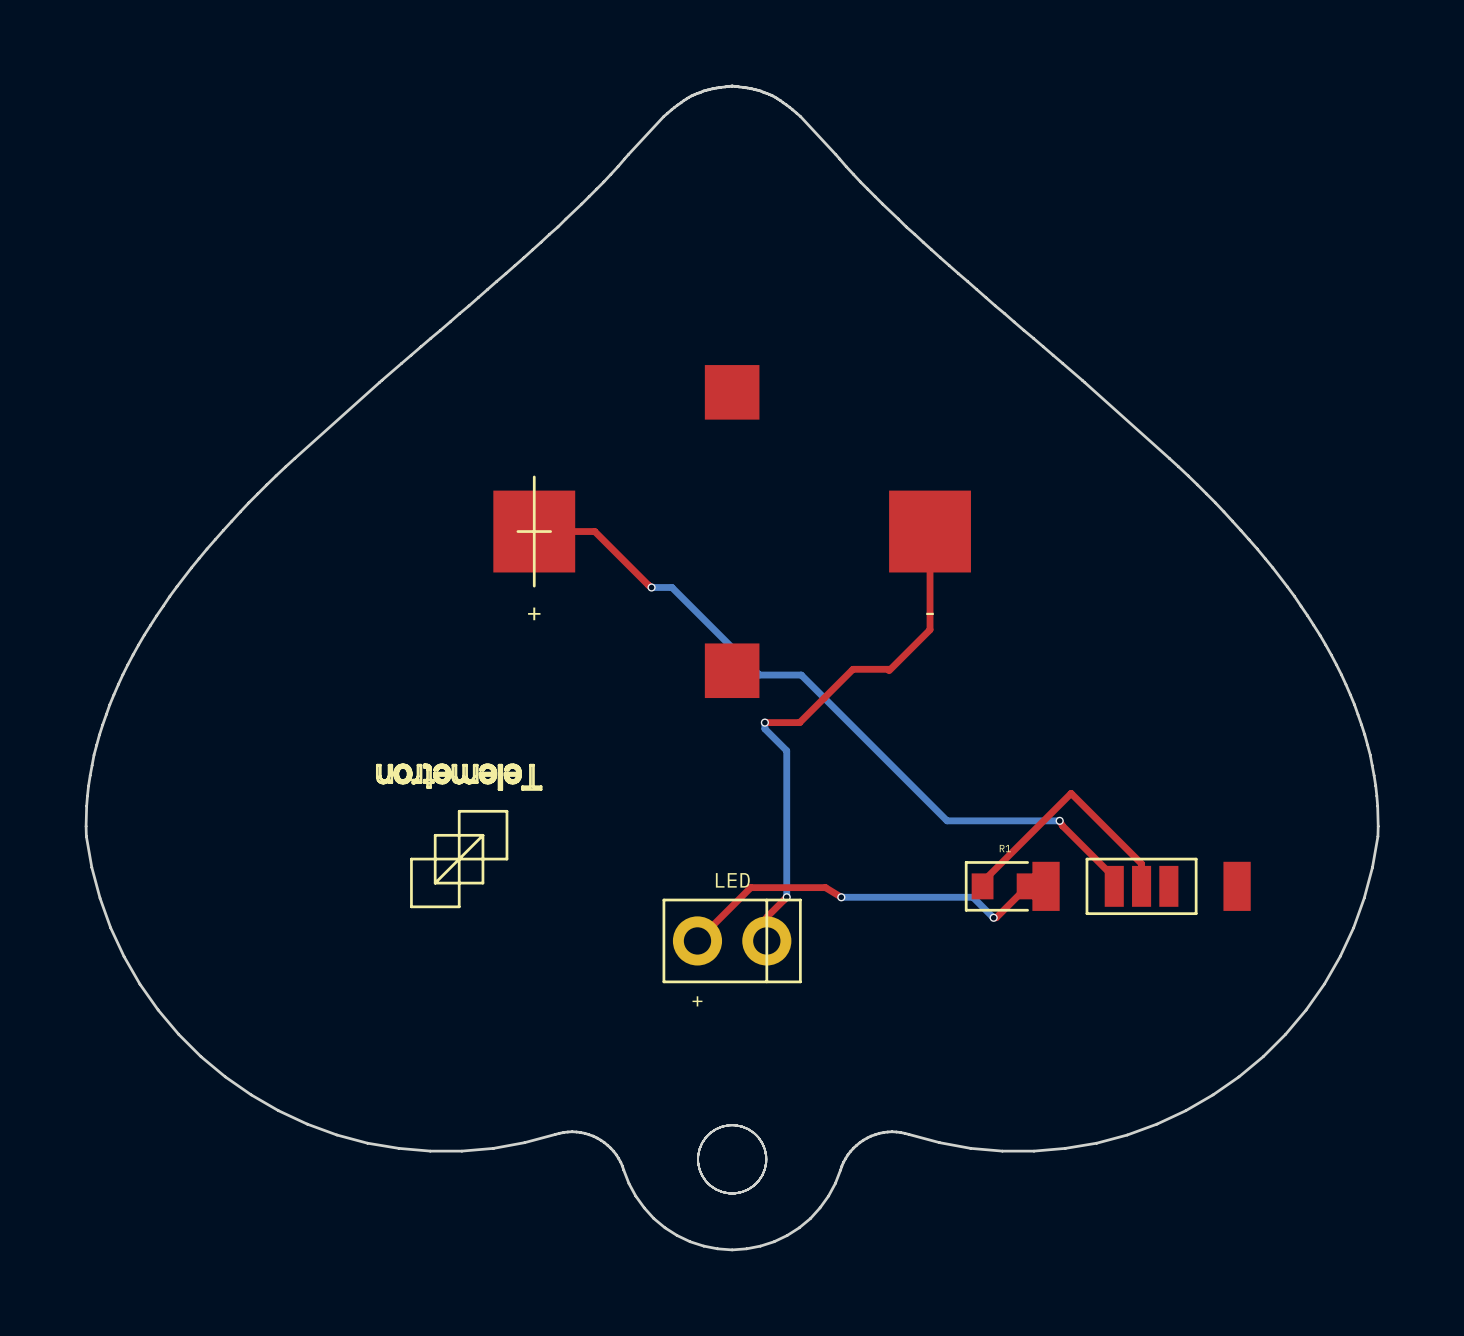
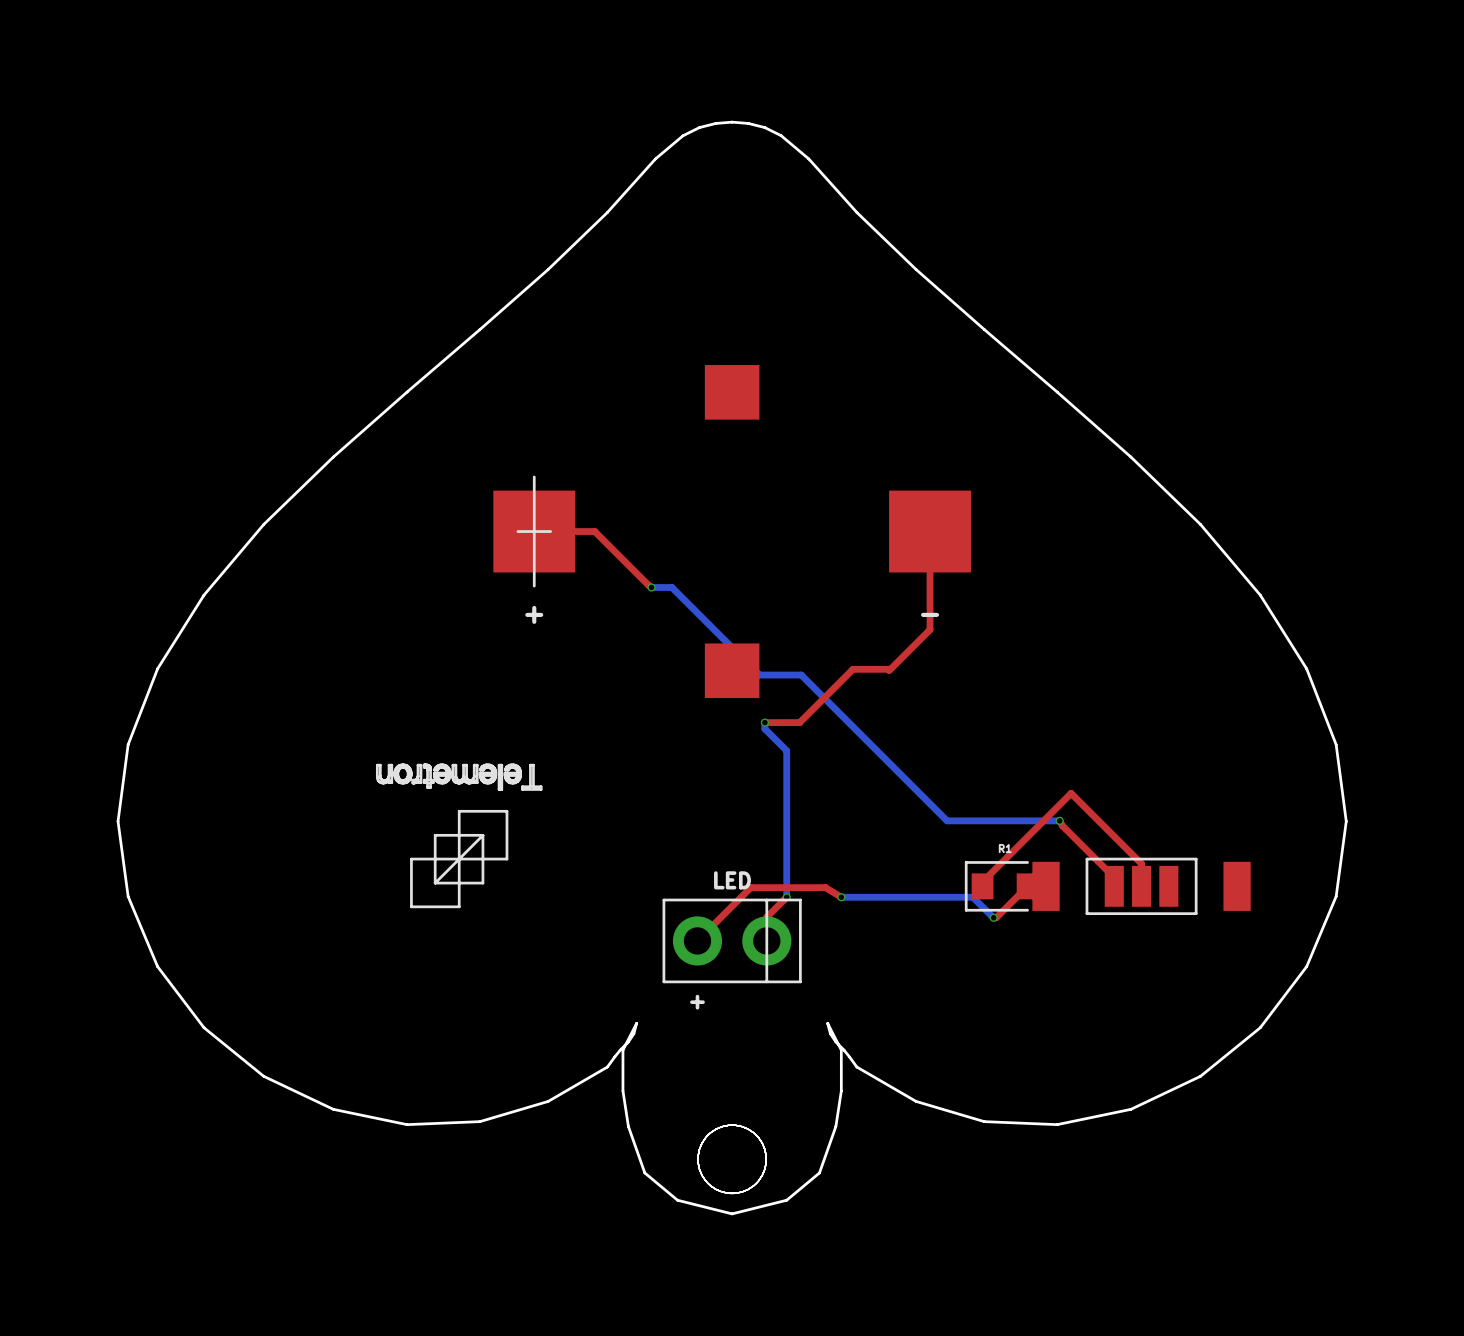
board edge: (731, 86) (752, 88) (772, 95) (800, 116) (860, 181) (906, 226) (1178, 466) (1215, 502) (1257, 549) (1307, 615) (1325, 645) (1345, 684) (1361, 724) (1370, 755) (1375, 785) (1378, 826) (1372, 867) (1364, 898) (1353, 927) (1324, 984) (1306, 1010) (1263, 1056) (1213, 1094) (1185, 1110) (1127, 1135) (1096, 1143) (1065, 1148) (1002, 1151) (970, 1148) (900, 1132) (879, 1133) (863, 1140) (850, 1151) (843, 1162) (828, 1196) (810, 1218) (799, 1227) (774, 1241) (746, 1248) (732, 1249) (717, 1248) (690, 1241) (665, 1227) (653, 1218) (635, 1196) (620, 1162) (613, 1151) (600, 1140) (585, 1133) (563, 1132) (493, 1148) (461, 1151) (398, 1148) (367, 1143) (336, 1135) (278, 1110) (251, 1094) (201, 1056) (158, 1010) (139, 984) (110, 927) (100, 898) (91, 867) (86, 826) (88, 785) (94, 755) (102, 724) (118, 684) (138, 645) (156, 615) (207, 549) (248, 502) (285, 466) (558, 226) (603, 181) (663, 116) (691, 95) (712, 88) (731, 86) -> (732, 122) (699, 127) (683, 135) (655, 158) (607, 212) (548, 269) (333, 457) (263, 524) (204, 595) (157, 668) (128, 744) (118, 821) (128, 896) (157, 966) (204, 1027) (263, 1076) (333, 1109) (407, 1124) (479, 1121) (548, 1101) (607, 1067) (620, 1050) (628, 1041) (633, 1033) (636, 1023) (622, 1050) (622, 1091) (628, 1126) (644, 1172) (677, 1200) (732, 1213) (786, 1200) (819, 1172) (835, 1126) (841, 1091) (841, 1050) (827, 1023) (830, 1033) (835, 1041) (844, 1050) (856, 1067) (916, 1101) (984, 1121) (1057, 1124) (1130, 1109) (1200, 1076) (1260, 1027) (1306, 966) (1336, 896) (1346, 821) (1336, 744) (1306, 668) (1260, 595) (1200, 524) (1130, 457) (916, 269) (856, 212) (808, 158) (781, 135) (764, 127) (732, 122)

